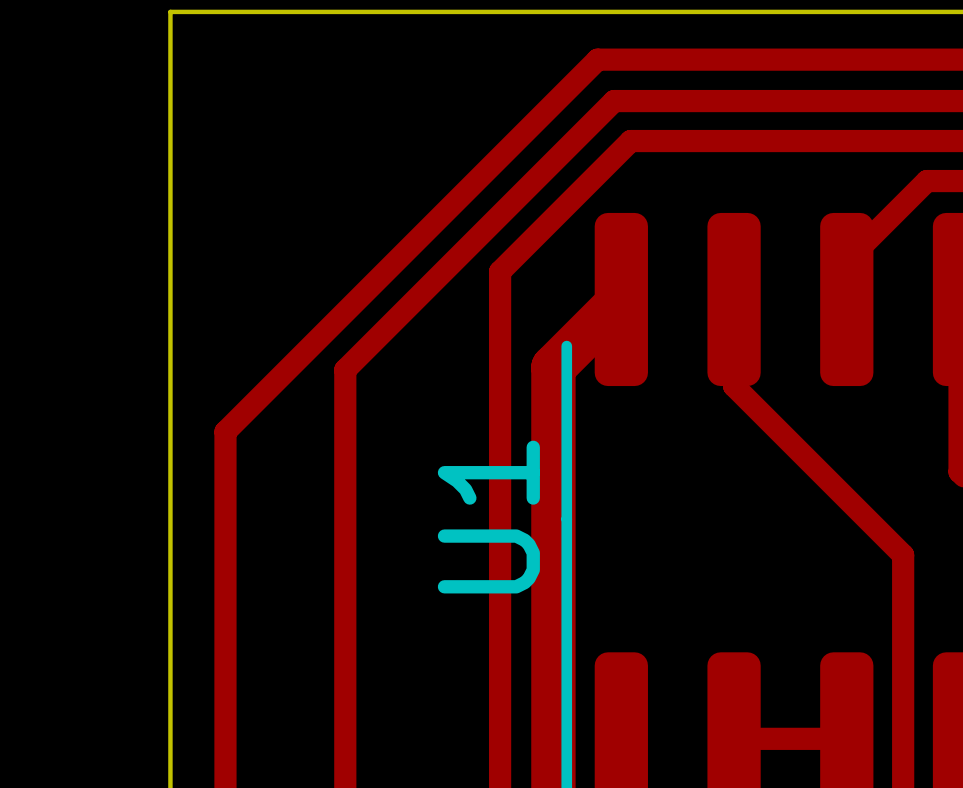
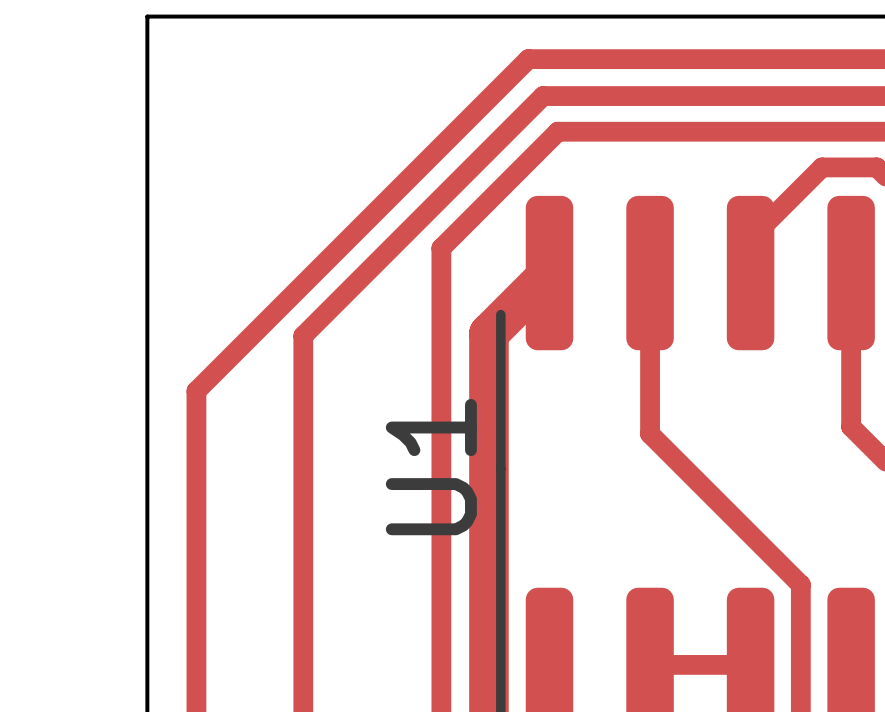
top track: (734, 386) (903, 555) (903, 649) -> (650, 350) (650, 433) (800, 584)

